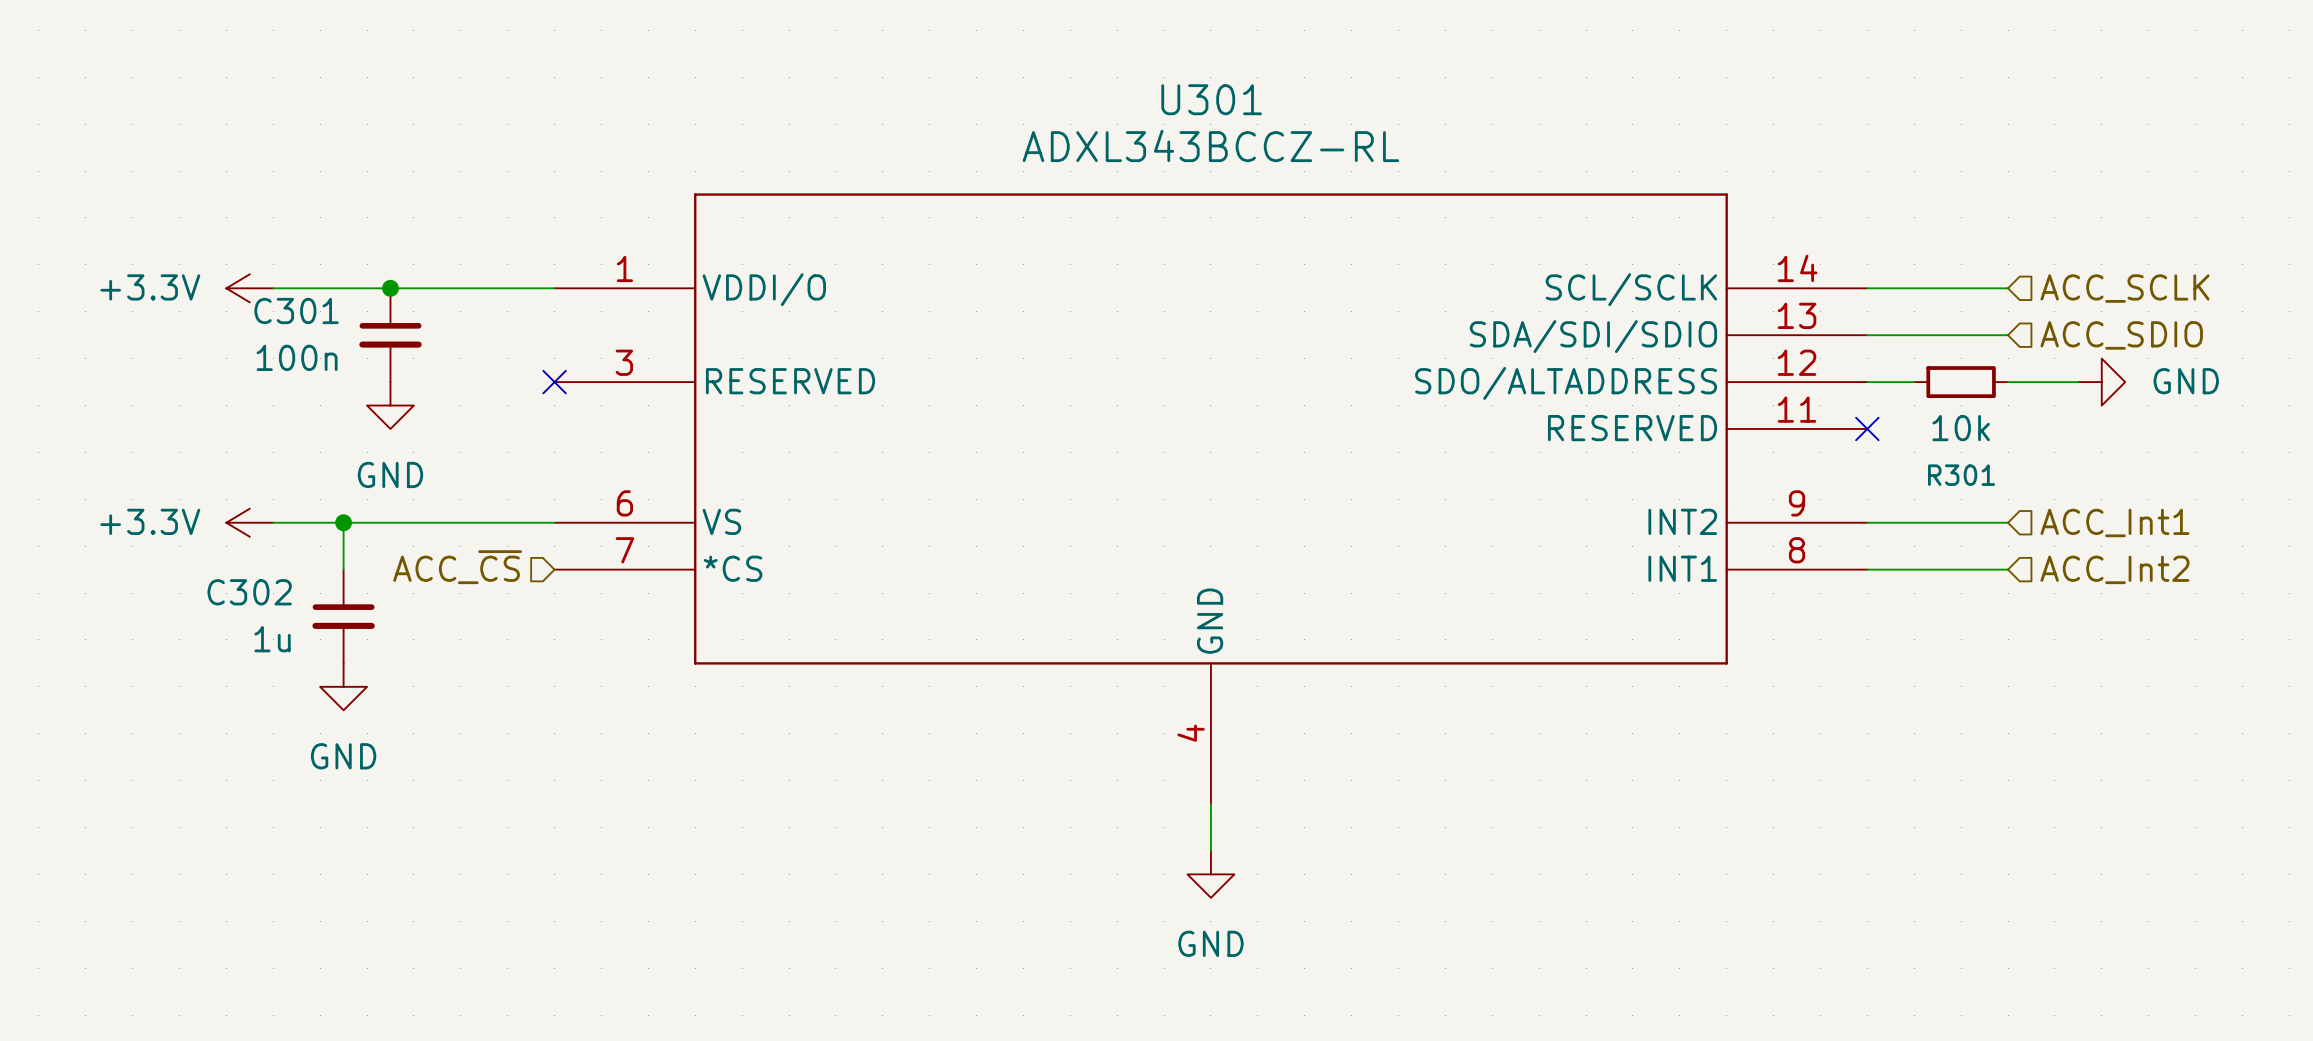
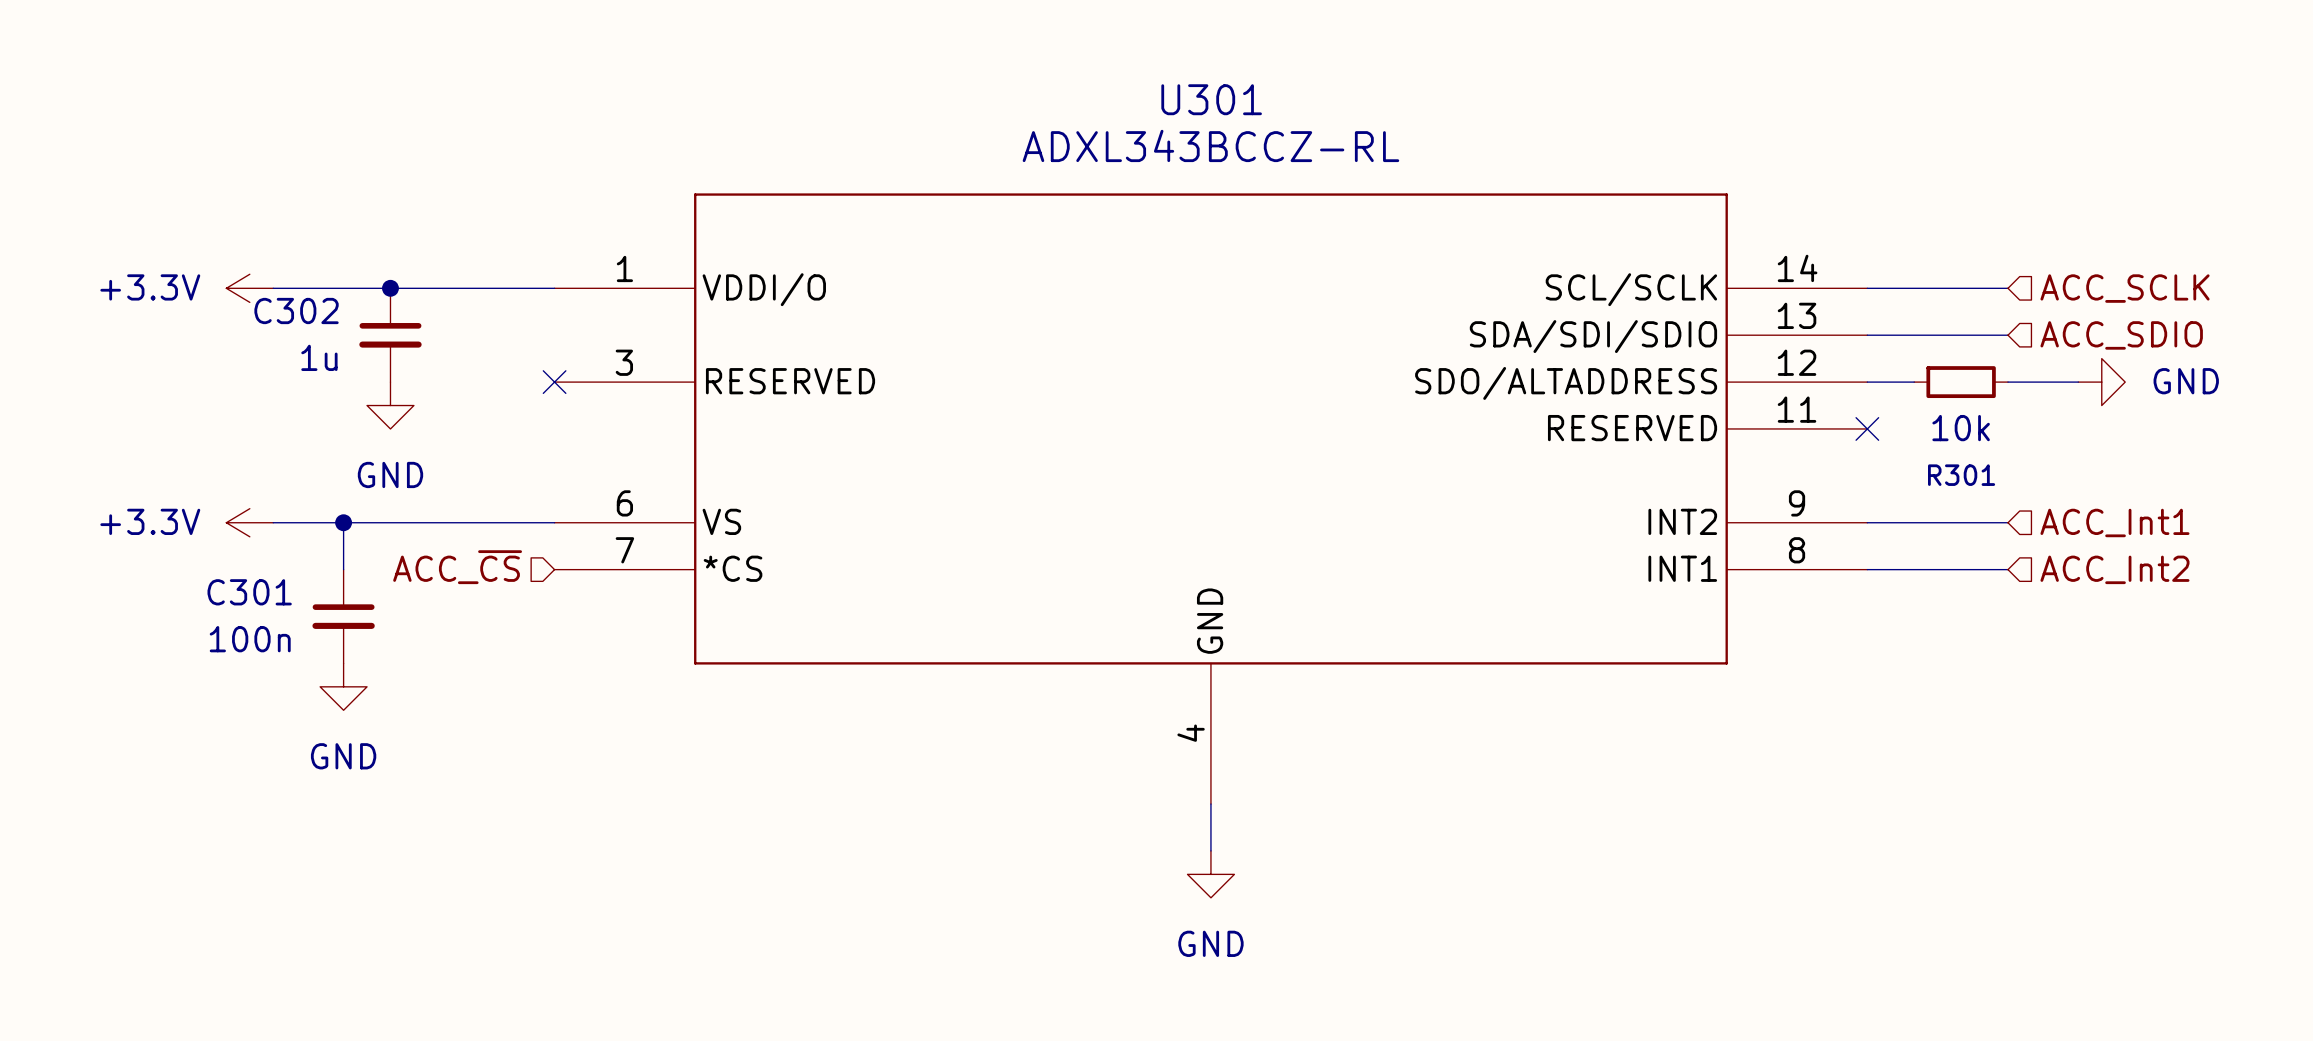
C301 name: C301 (296, 311) -> C302 (296, 311)
C301 value: 100n (297, 357) -> 1u (319, 357)
C302 name: C302 (249, 592) -> C301 (249, 592)
C302 value: 1u (272, 639) -> 100n (250, 639)

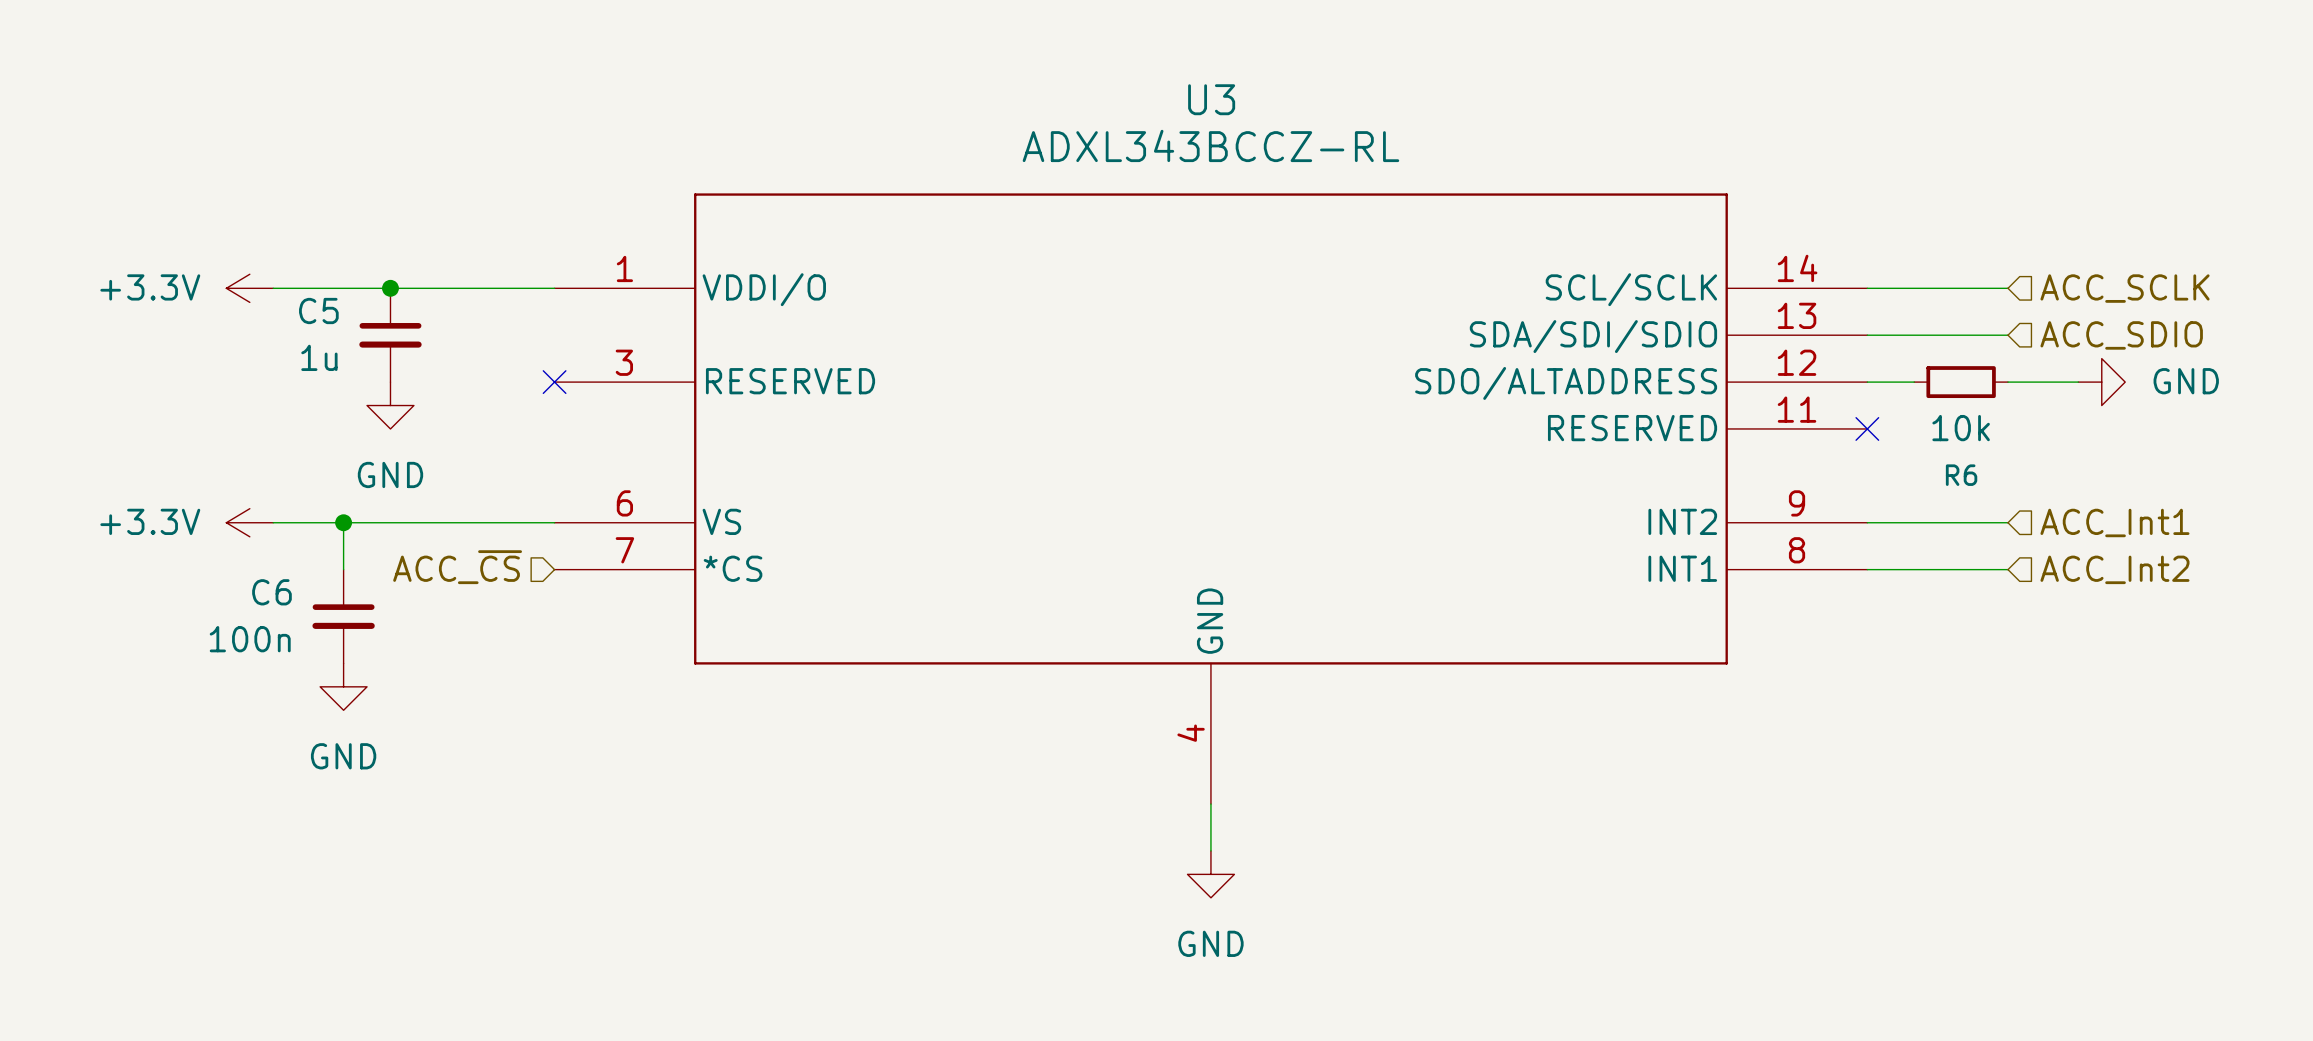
U301 name: U301 (1211, 99) -> U3 (1211, 99)
C302 name: C302 (296, 311) -> C5 (318, 311)
R301 name: R301 (1961, 475) -> R6 (1961, 475)
C301 name: C301 (249, 592) -> C6 (271, 592)

